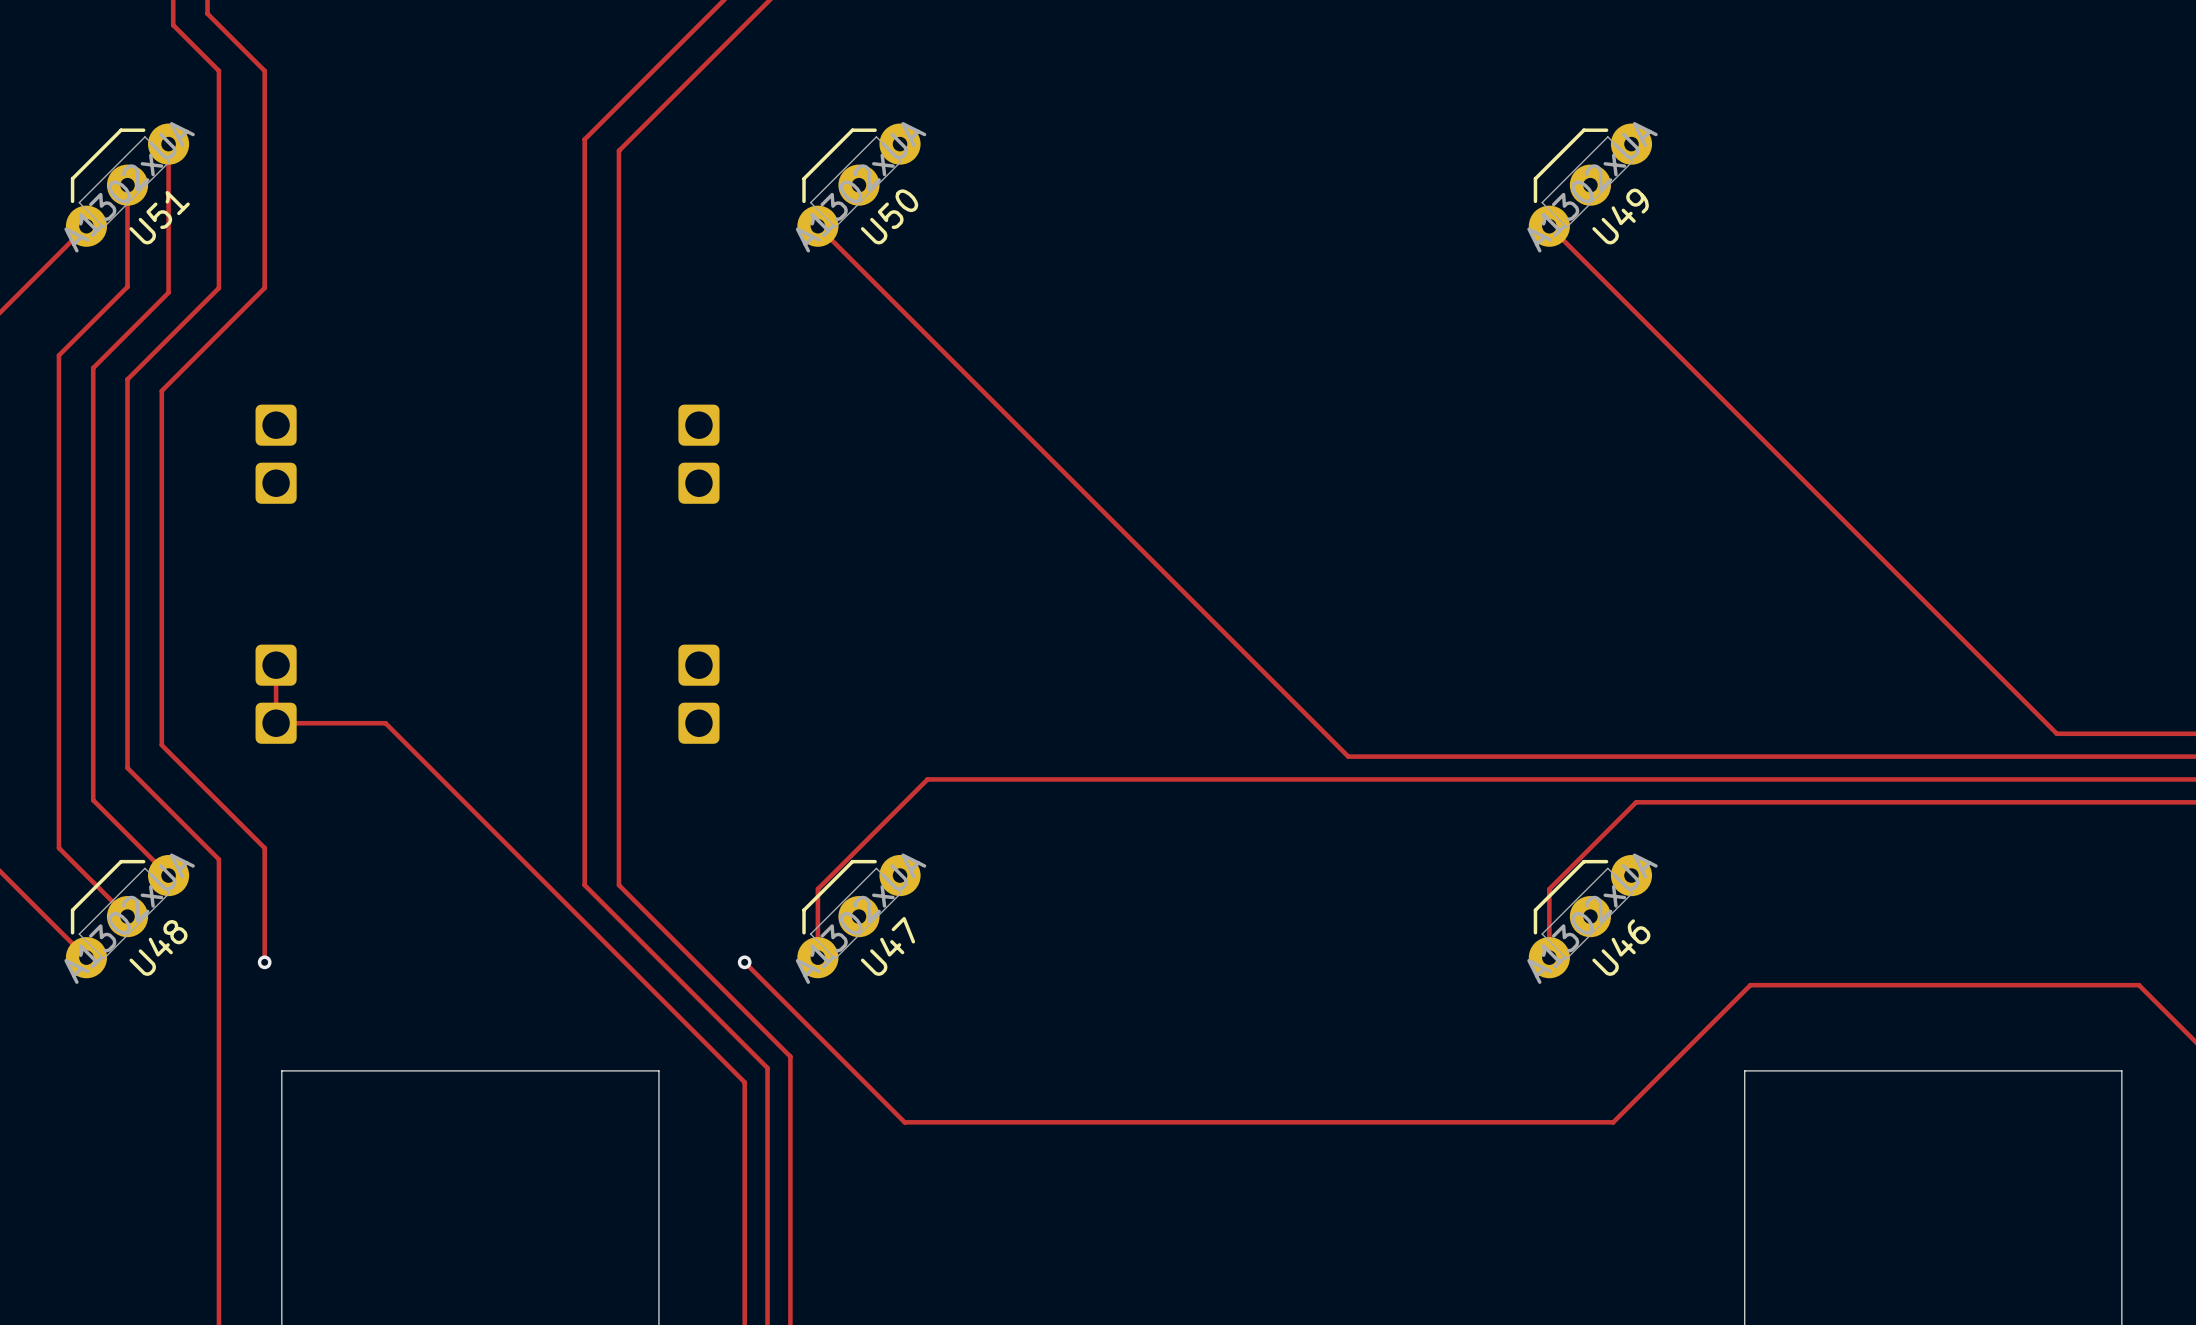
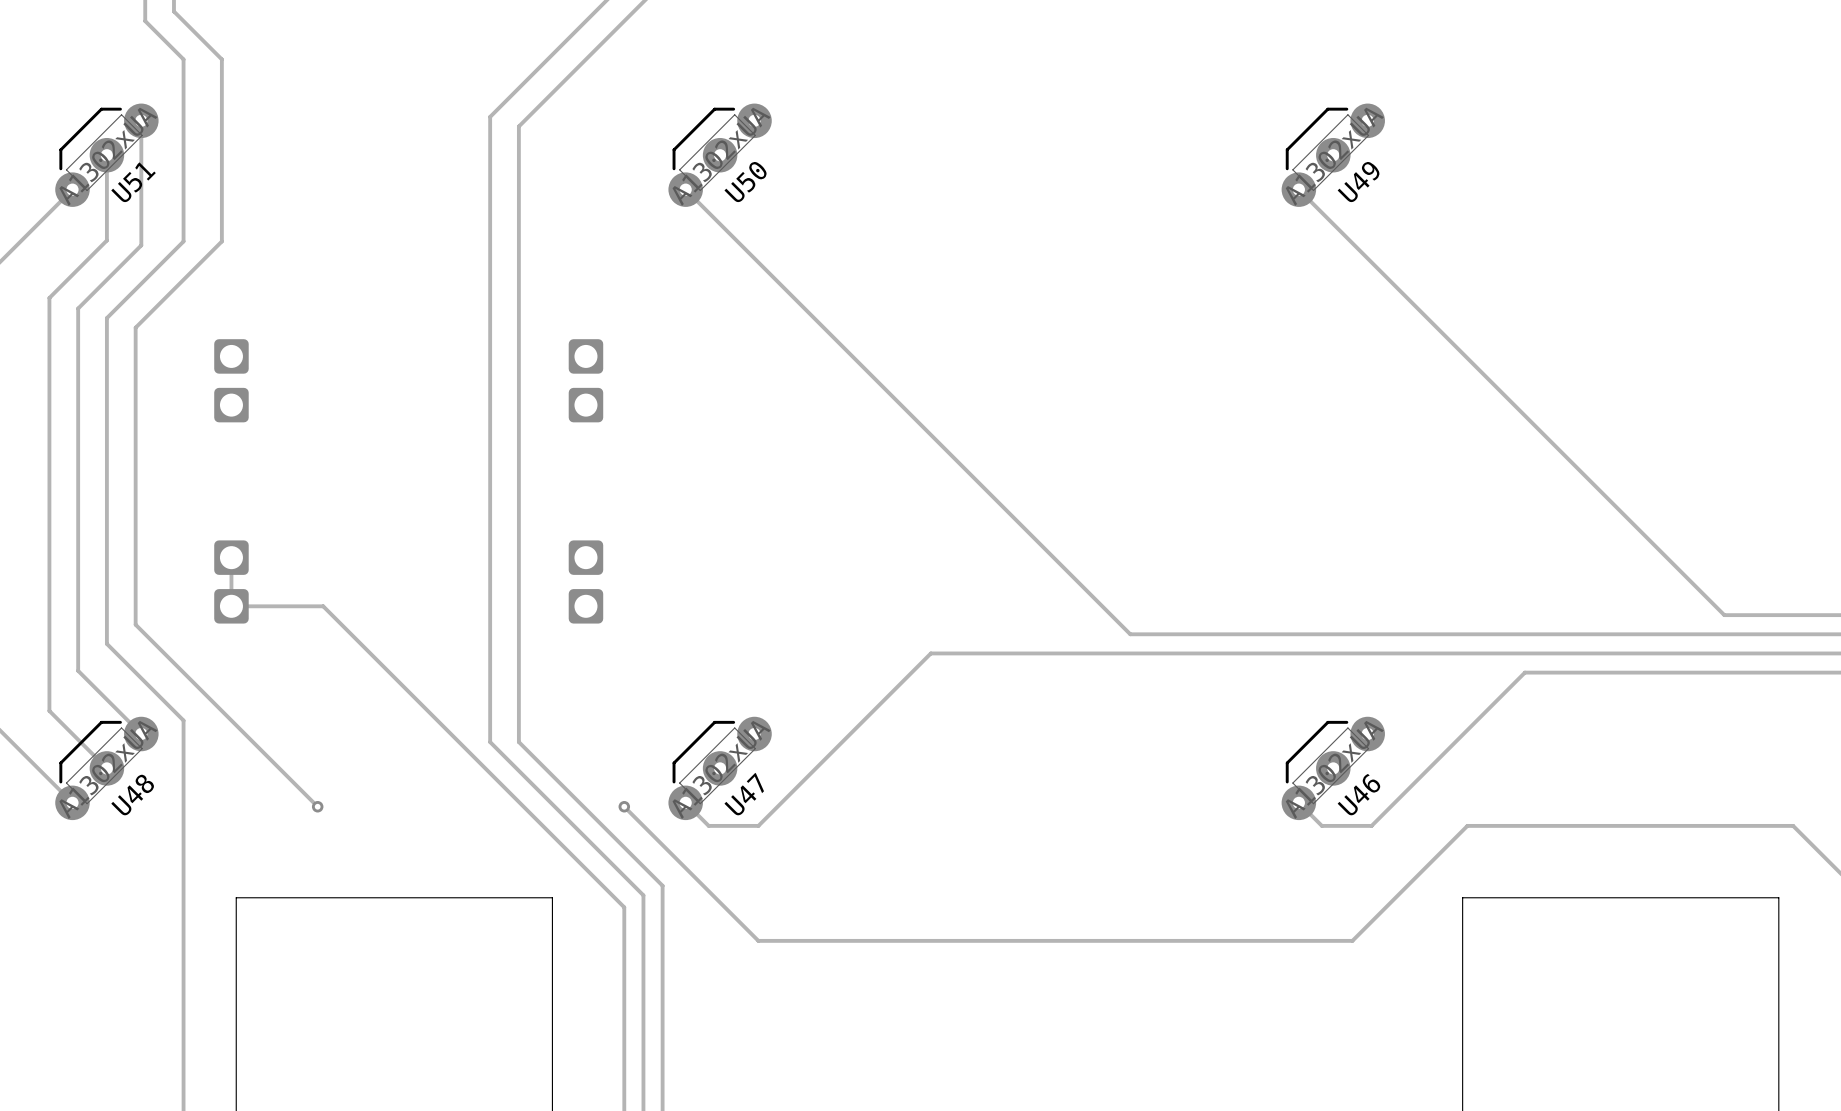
track: (1110, 779) (927, 779) (817, 889) (817, 957) -> (930, 653) (758, 825) (708, 825) (685, 802)
track: (1818, 802) (1636, 802) (1549, 889) (1549, 957) -> (1524, 672) (1371, 825) (1321, 825) (1298, 802)
track: (264, 848) (264, 962) -> (221, 710) (317, 806)
via position: (264, 962) -> (317, 806)

